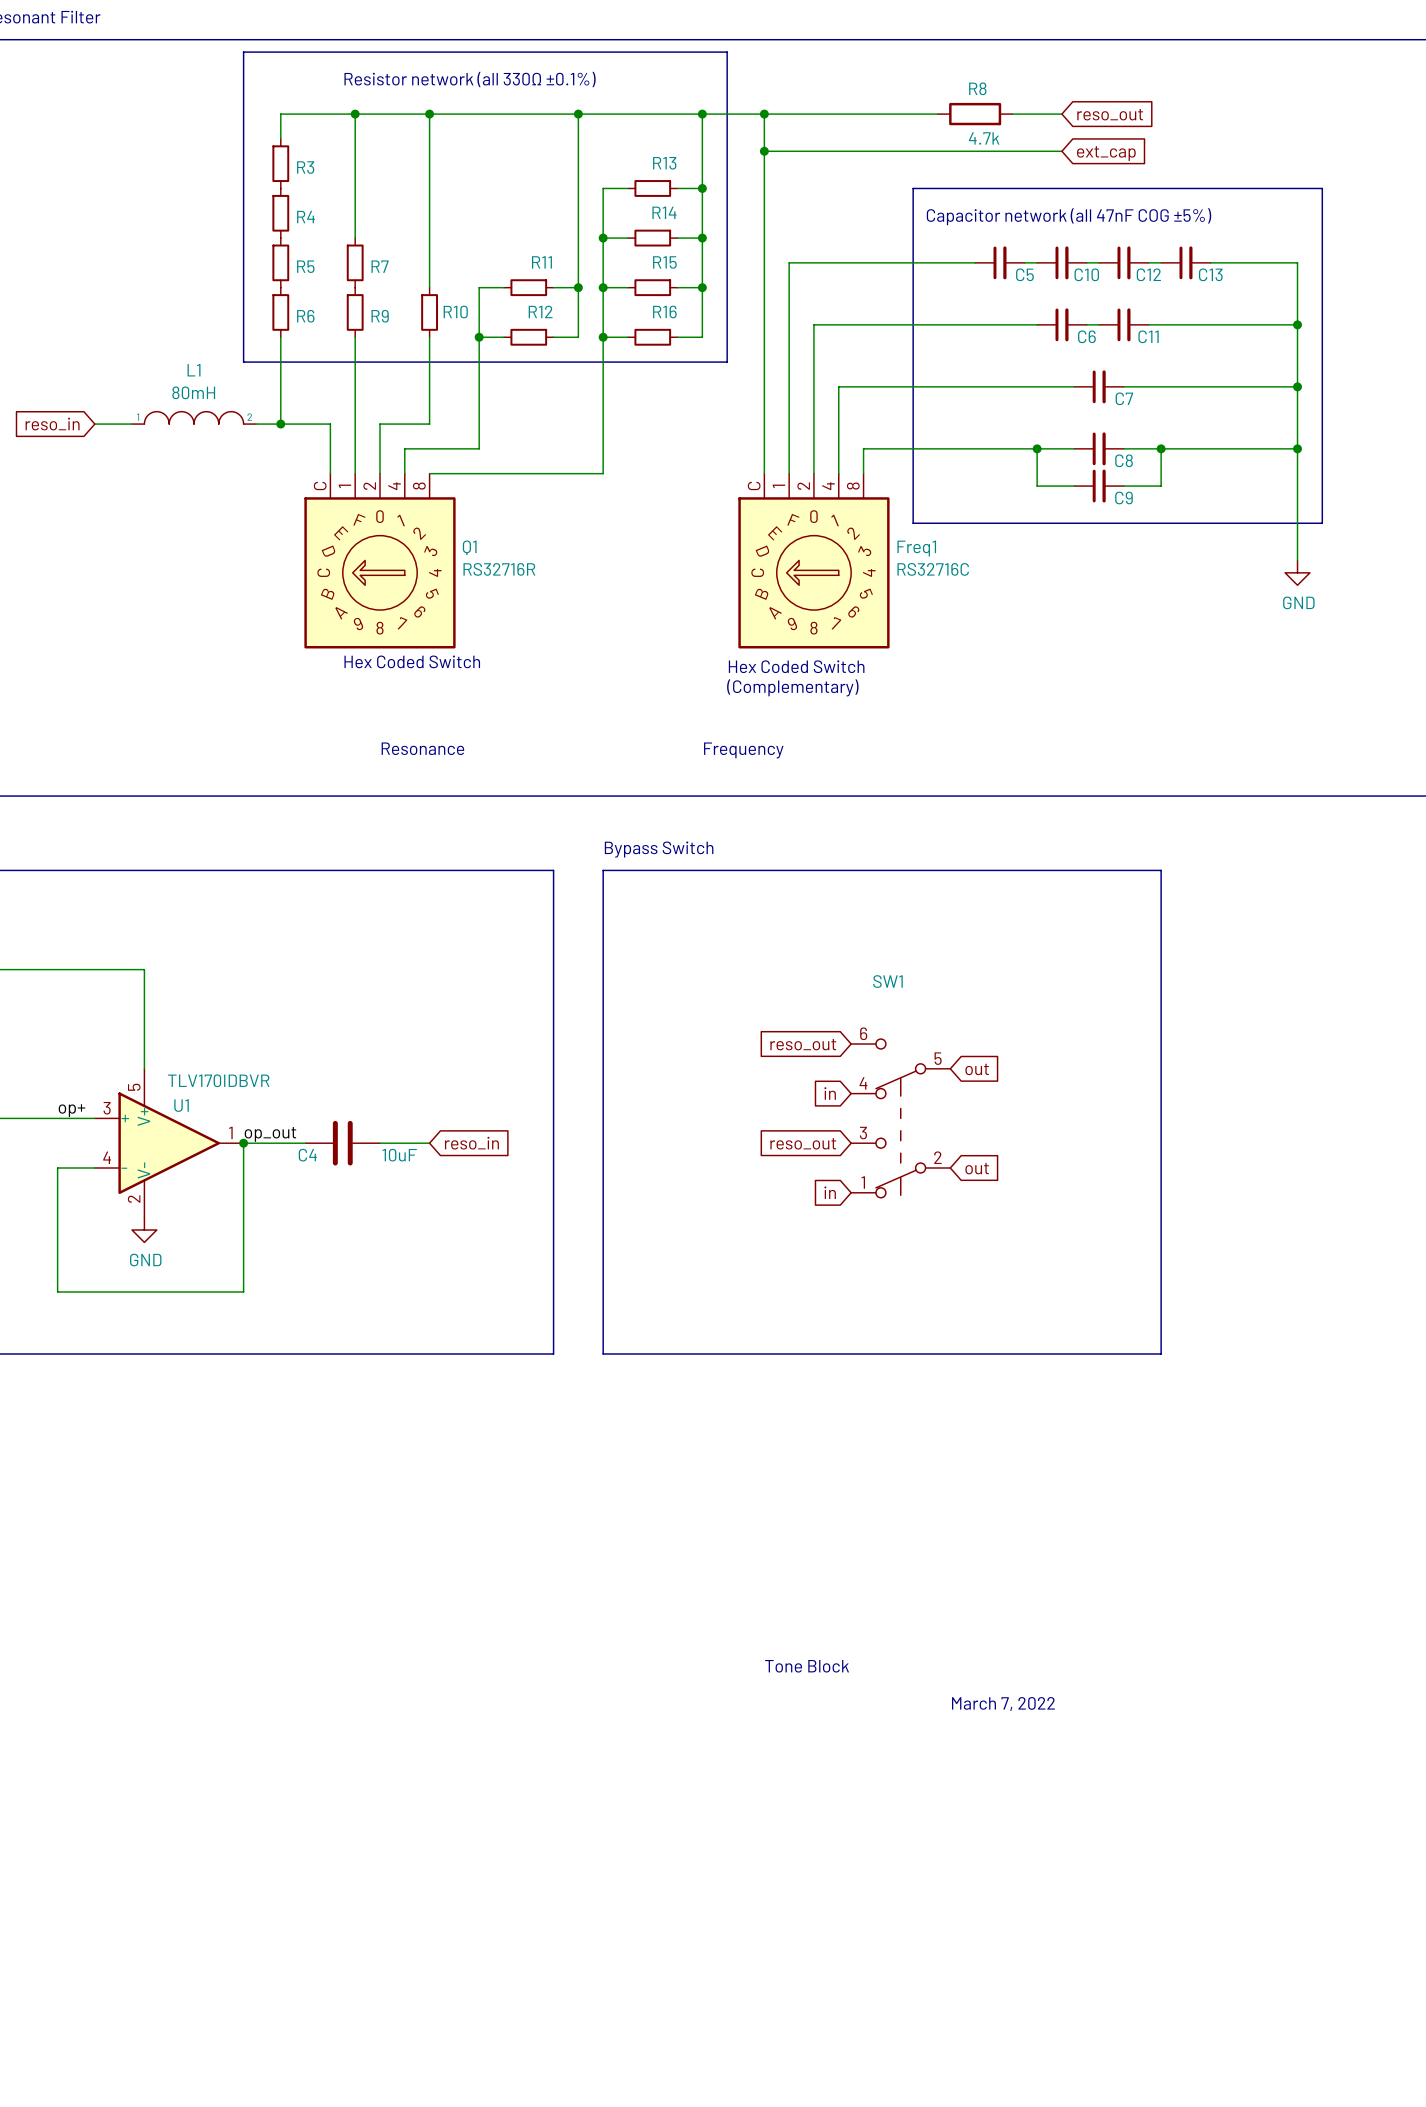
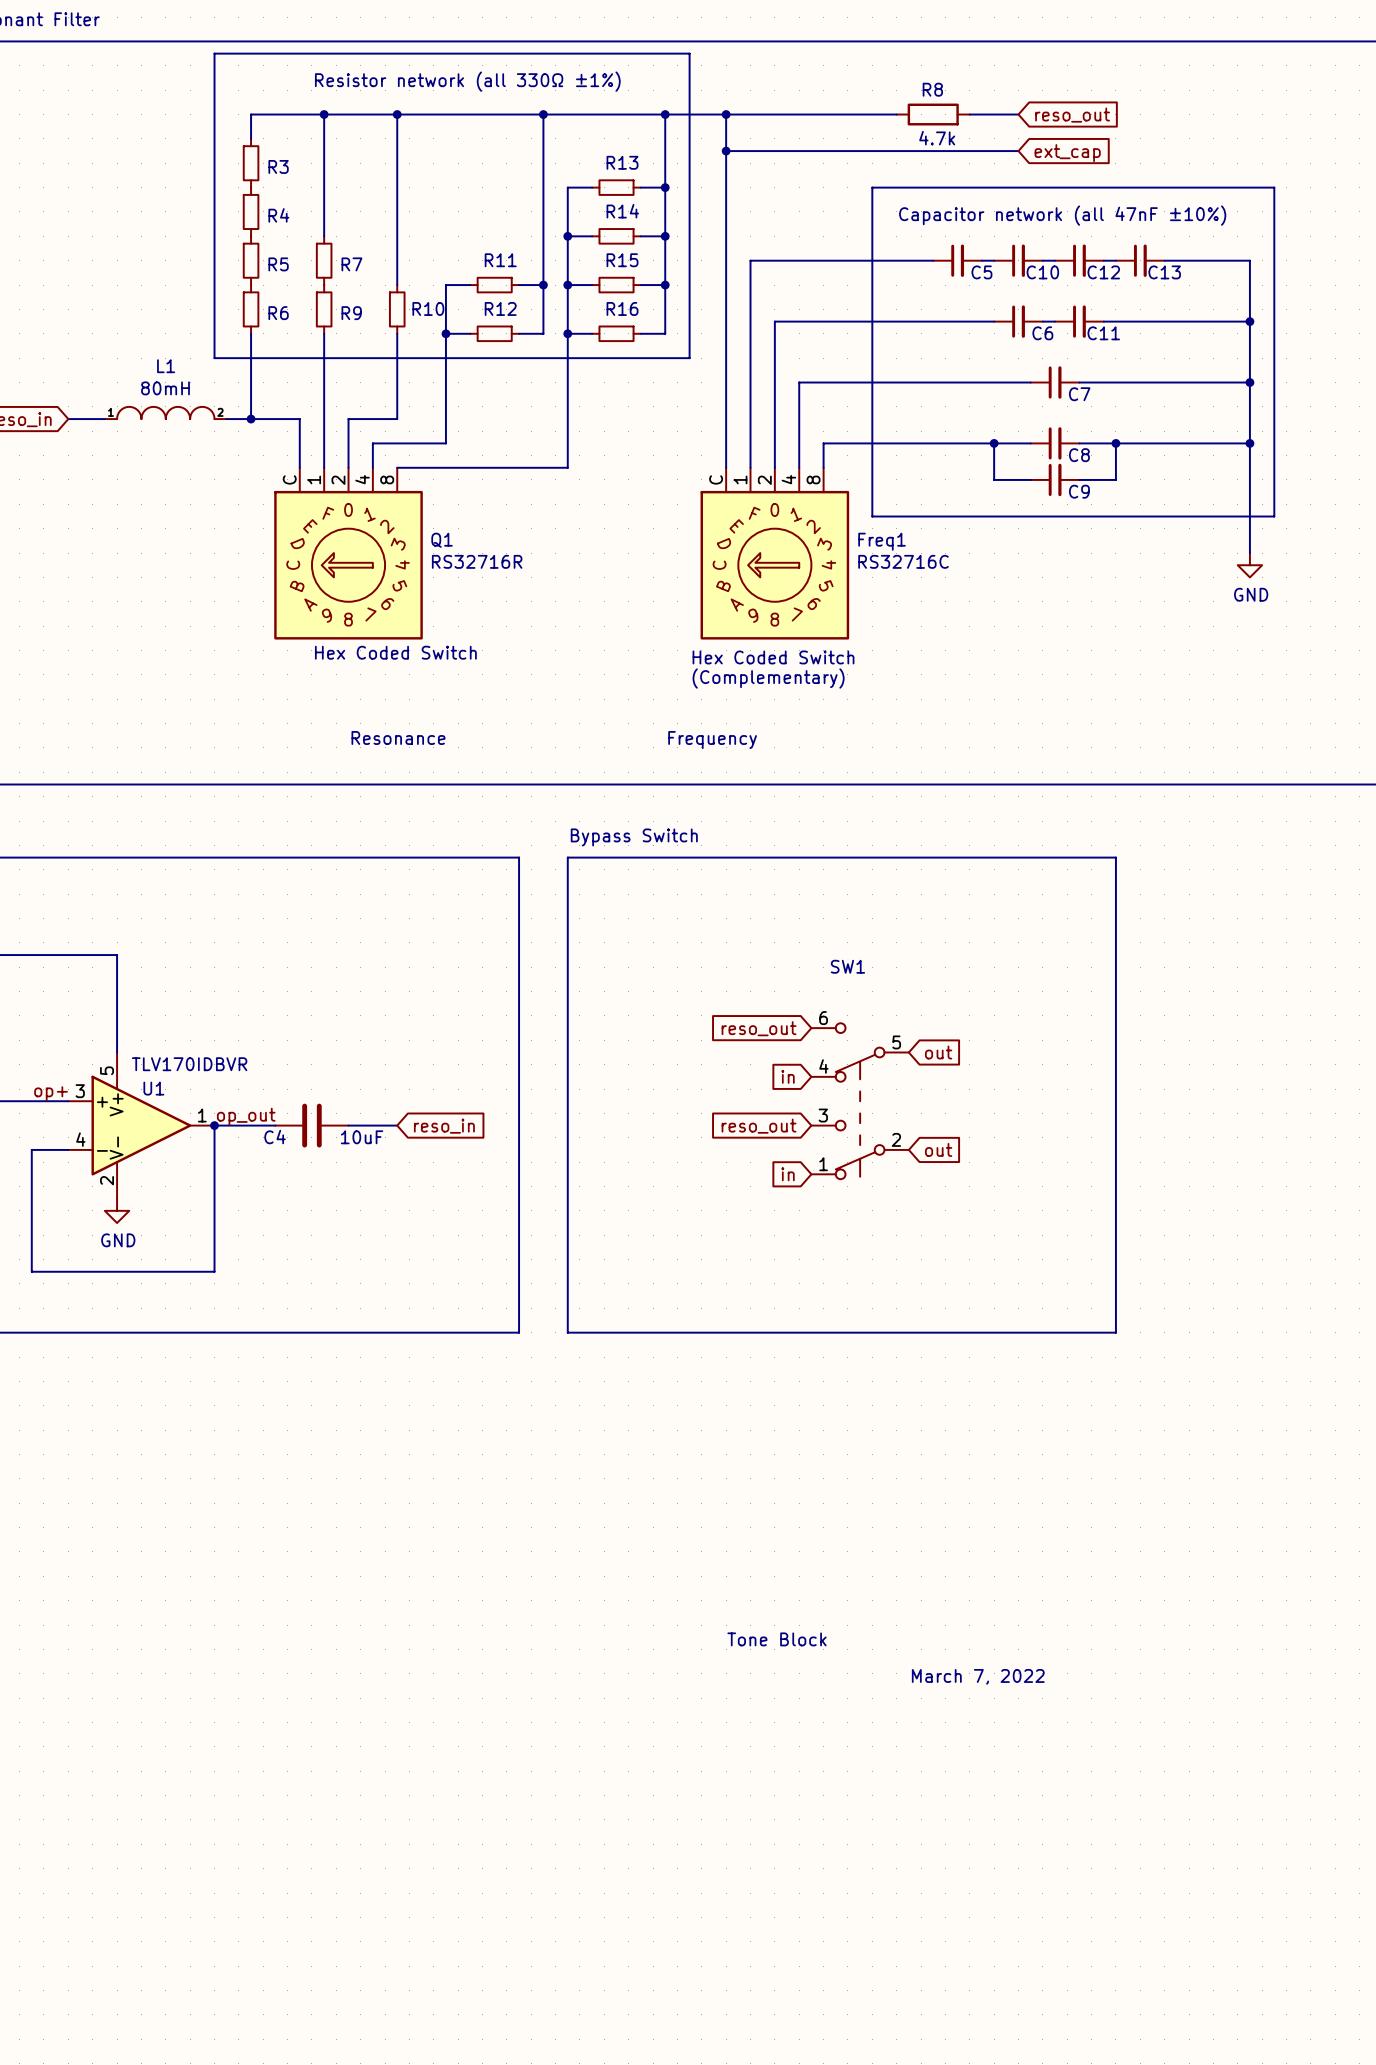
text: Resistor network (all 330Ω ±0.1%) (470, 79) -> Resistor network (all 330Ω ±1%) (467, 81)
text: Capacitor network (all 47nF COG ±5%) (1069, 216) -> Capacitor network (all 47nF ±10%) (1062, 215)

